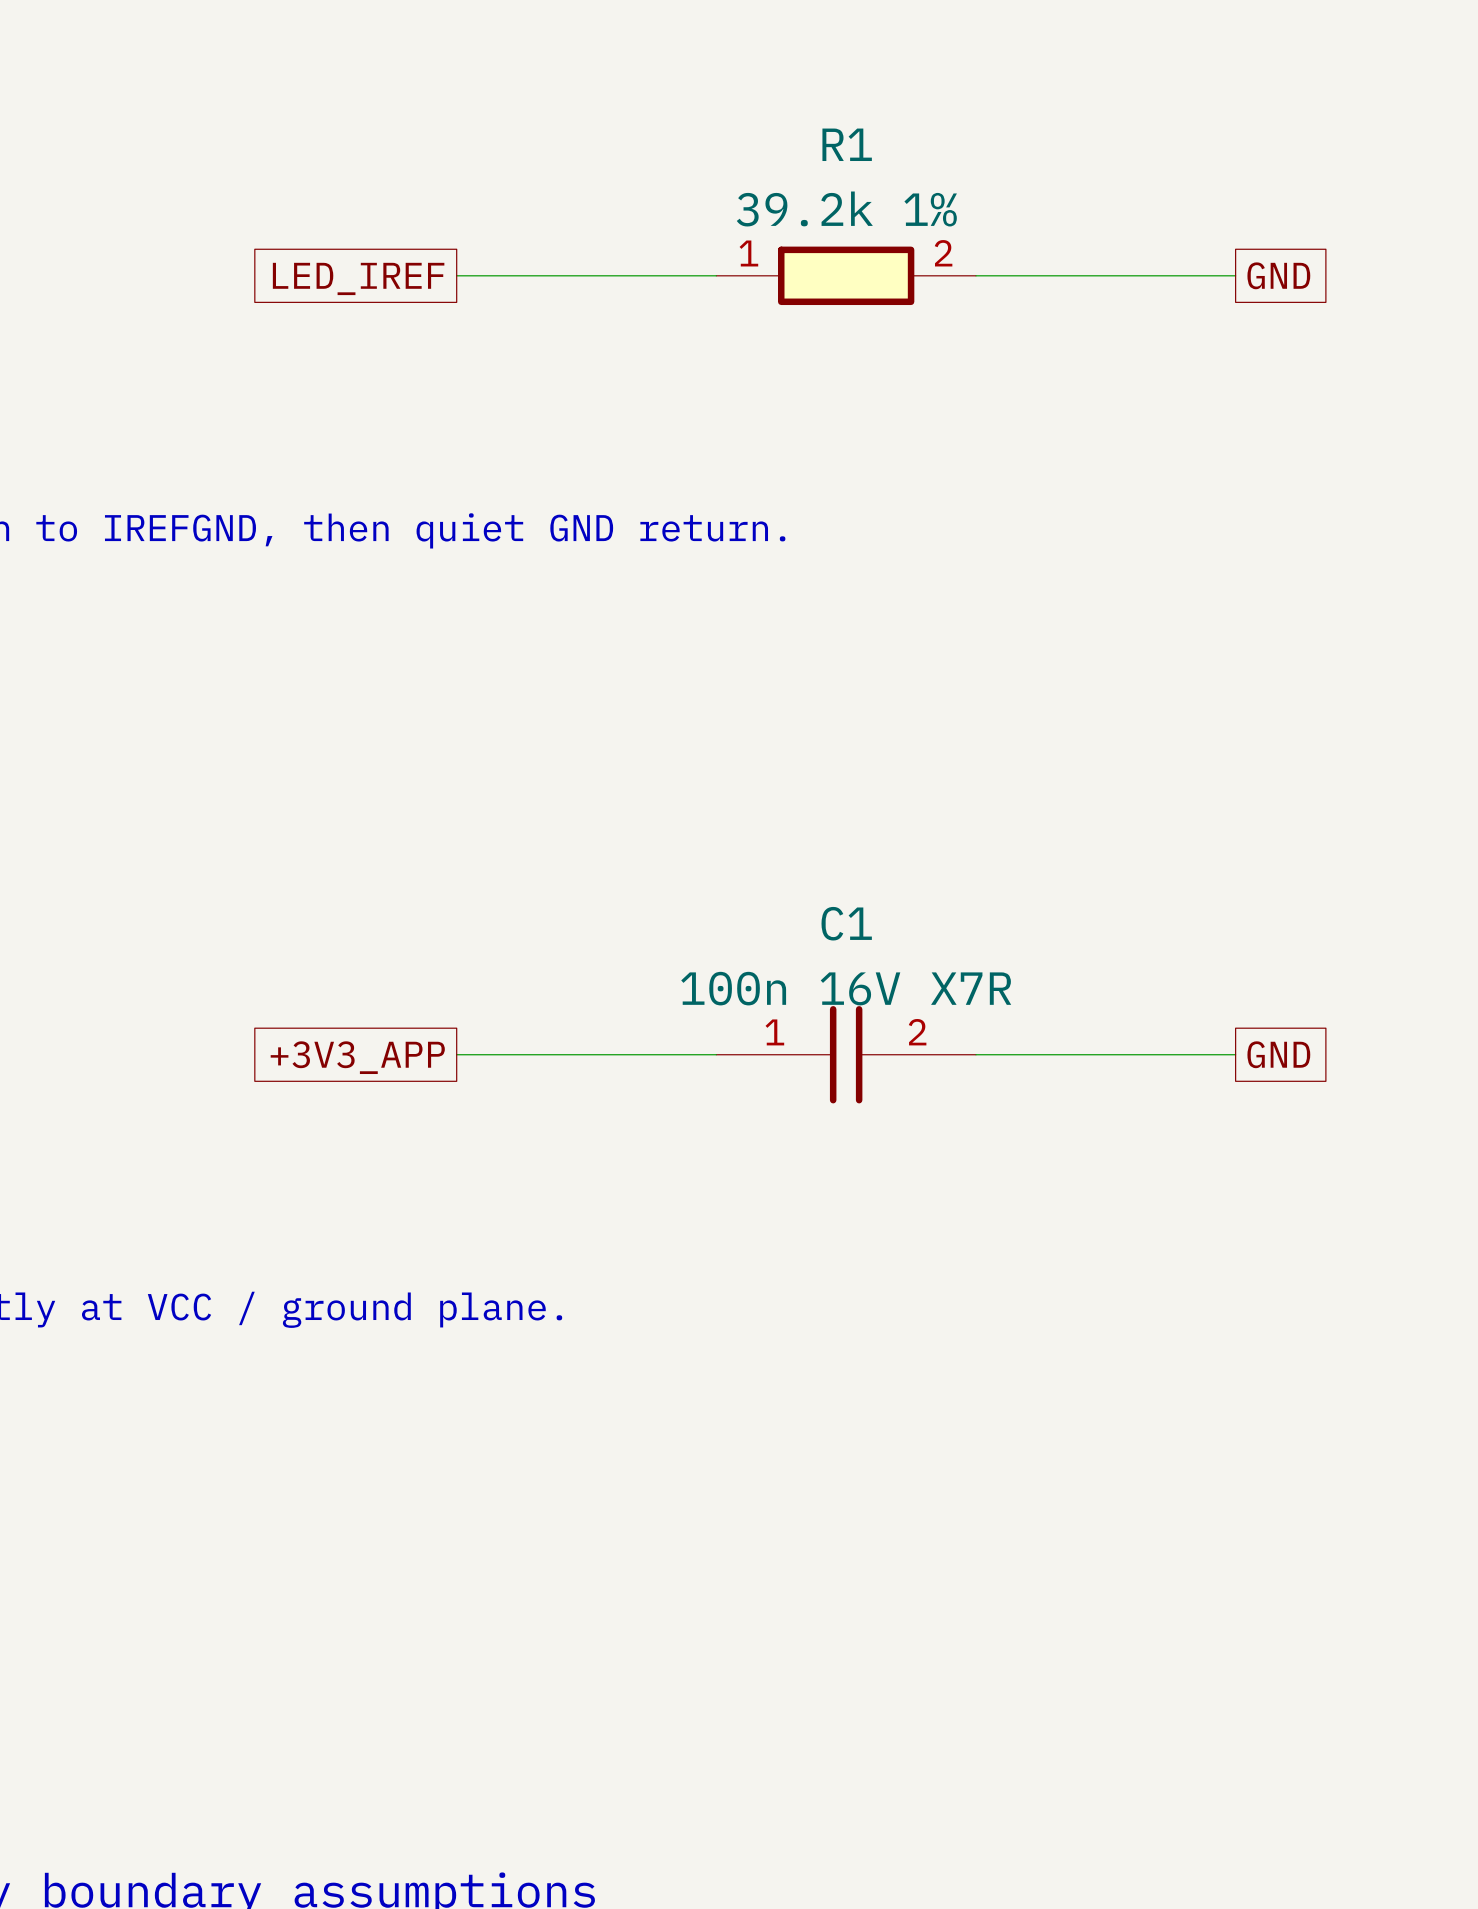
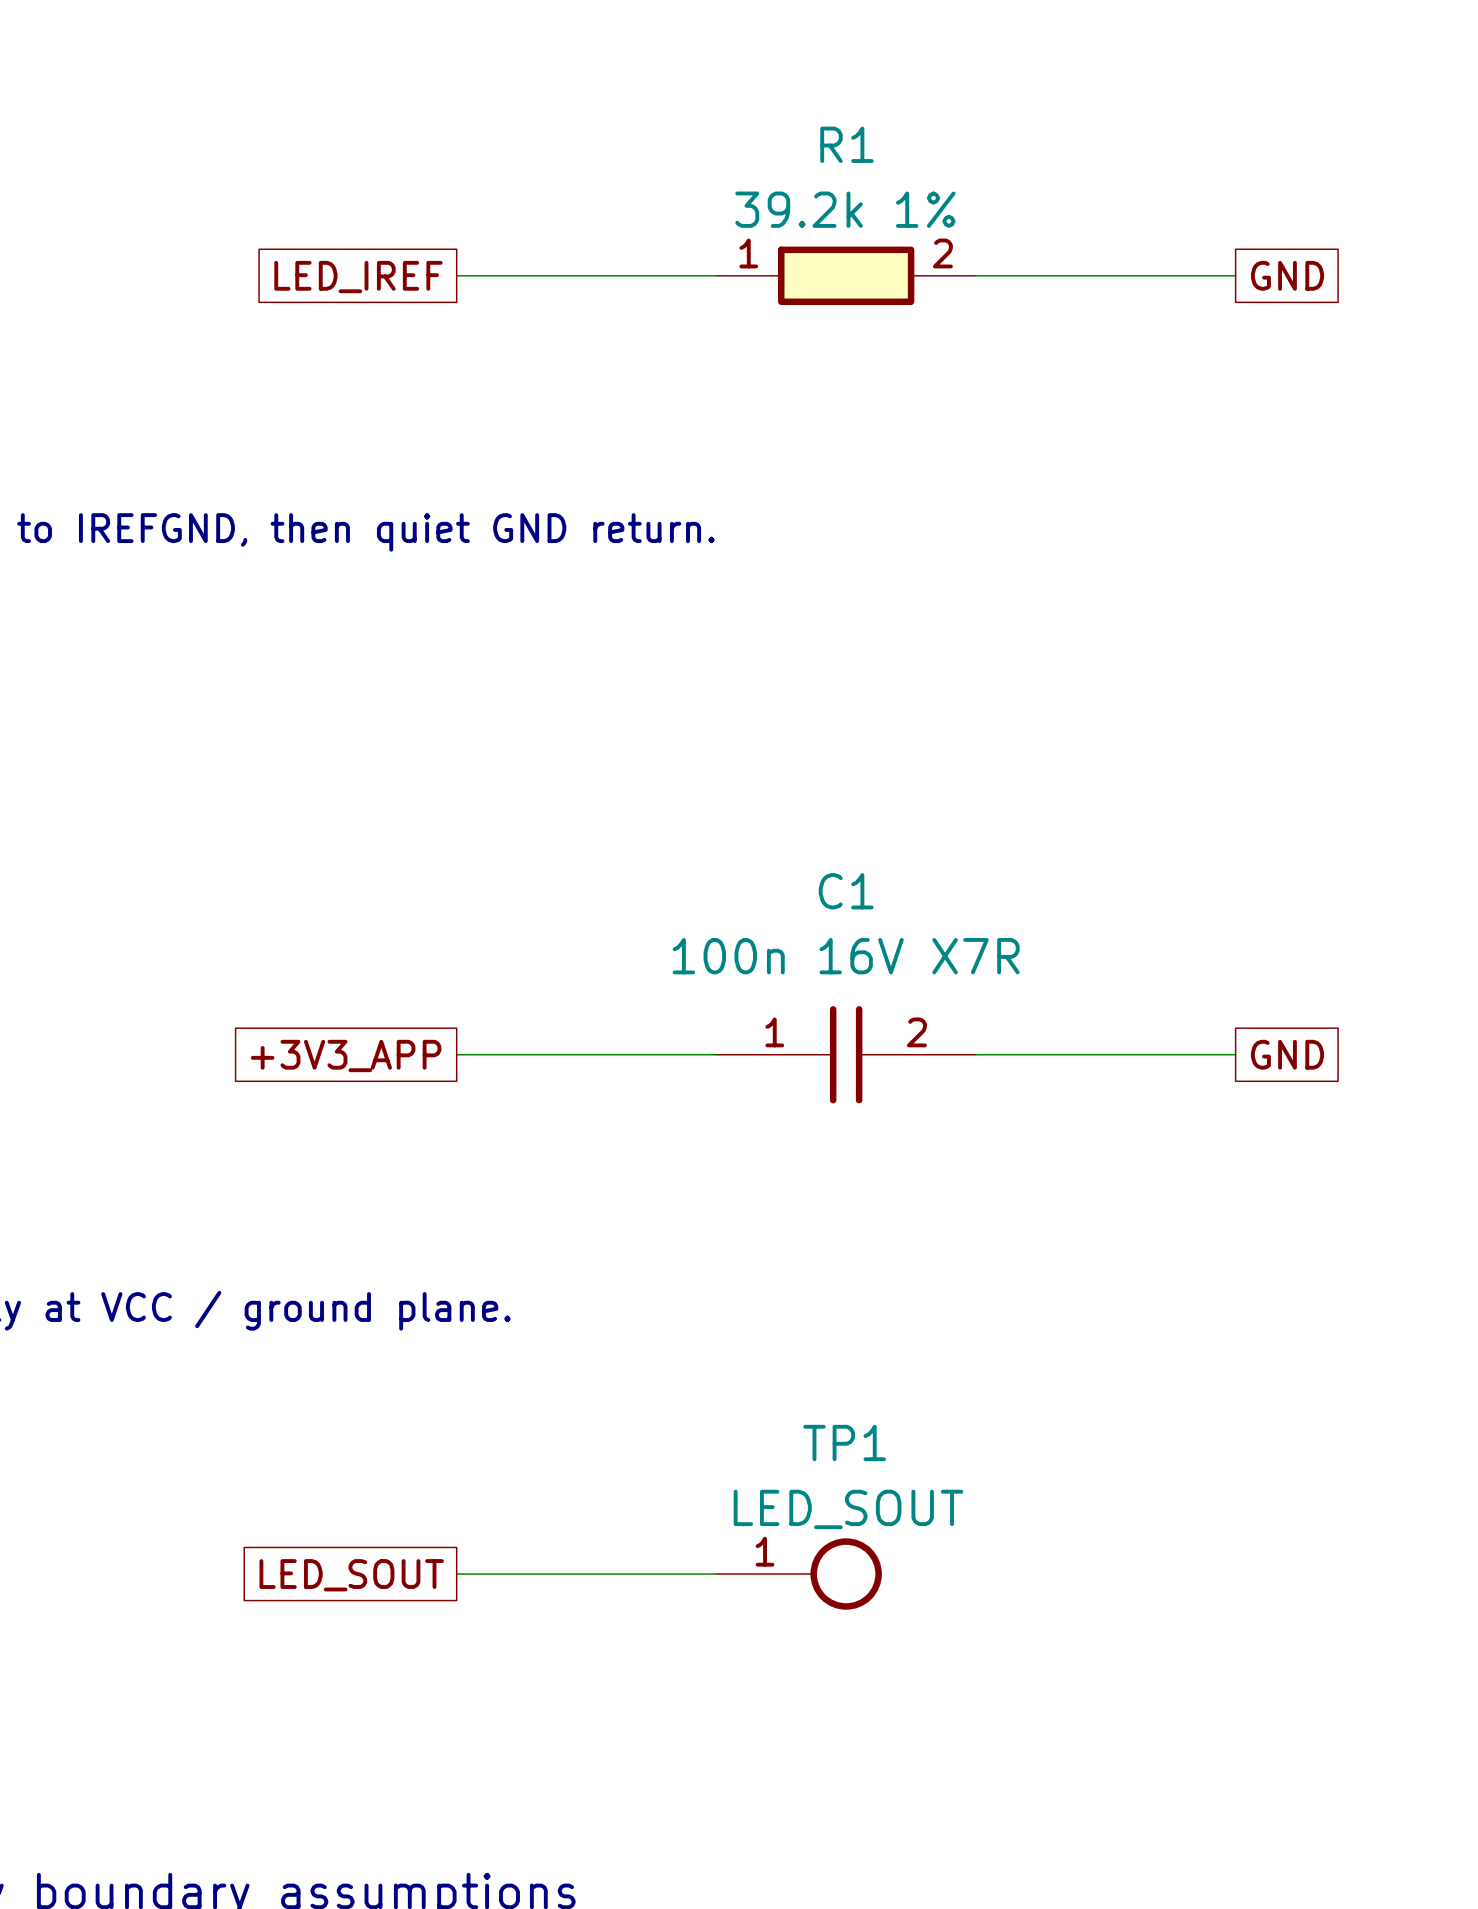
C1 name position: C1 (846, 923) -> C1 (846, 891)
C1 value position: 100n 16V X7R (846, 988) -> 100n 16V X7R (846, 956)
wire: none -> (456, 1574) (716, 1574)
TP1: none -> LED_SOUT (799, 1574)
global label: none -> LED_SOUT (351, 1575)

